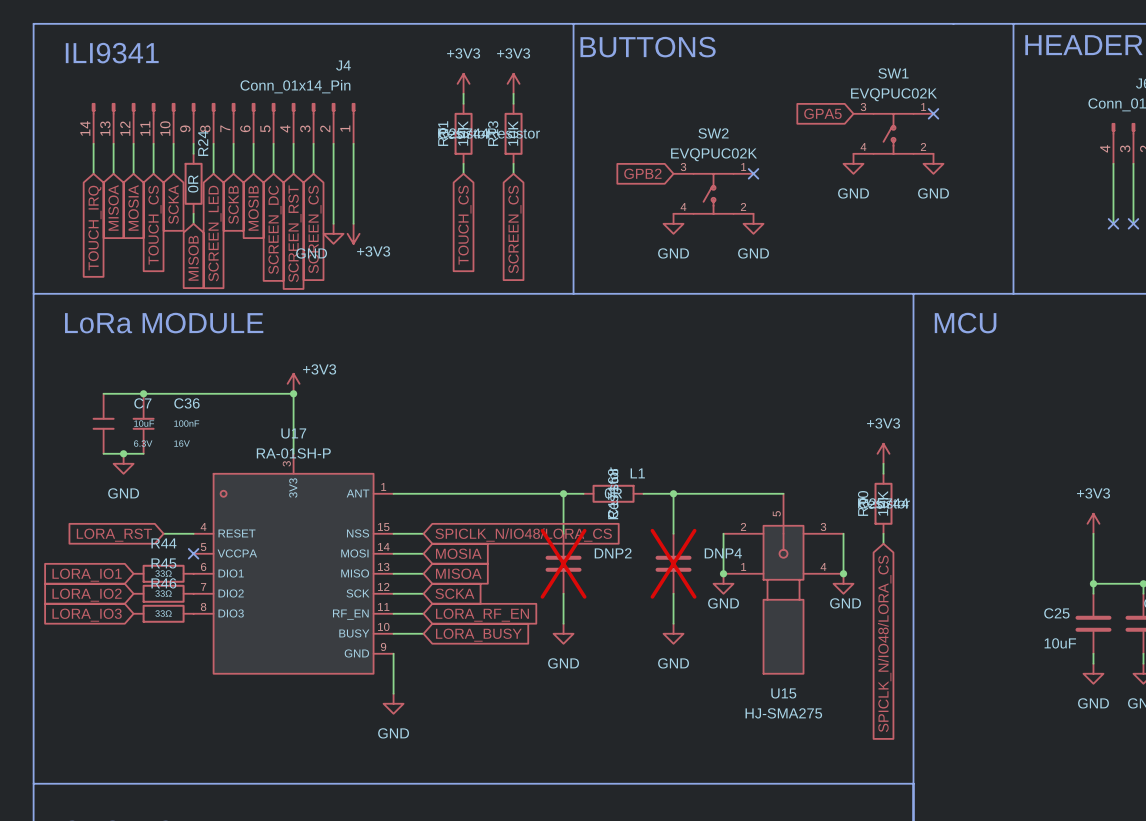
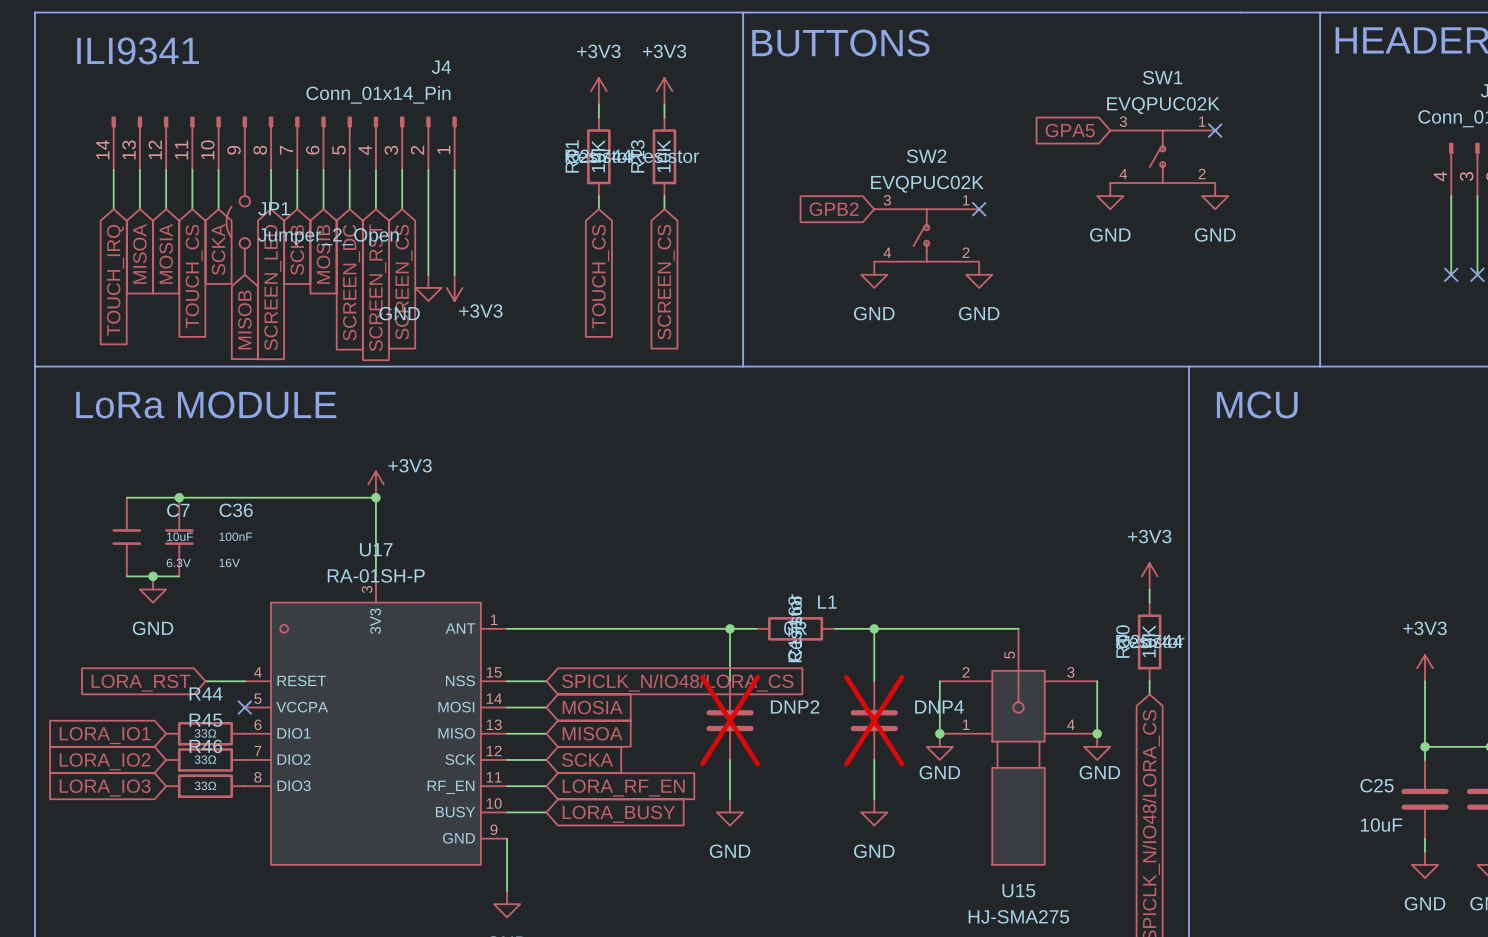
JP1: none -> Jumper_2_Open (238, 222)
R24: 0R (193, 183) -> none

